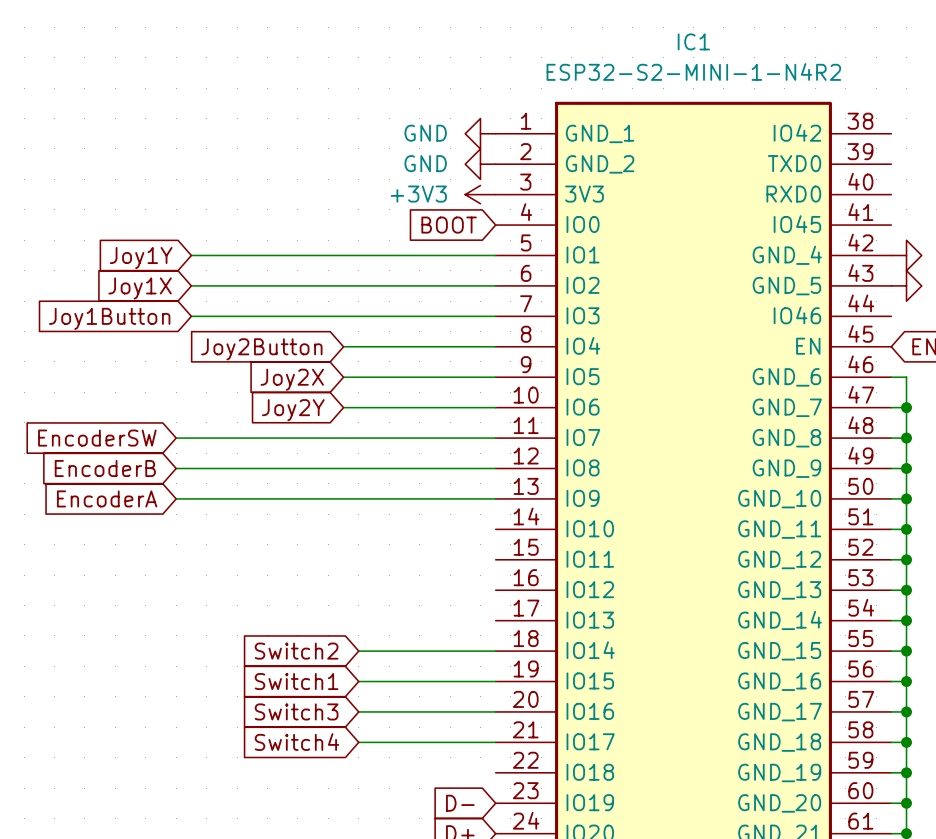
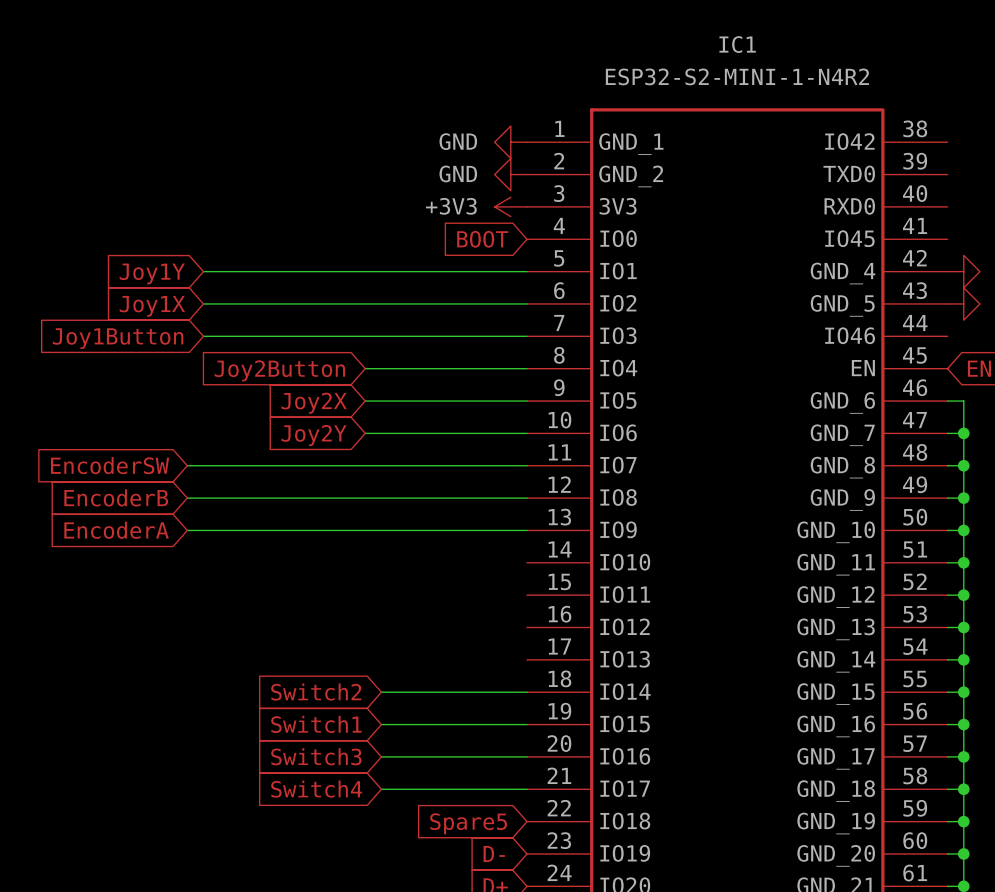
global label: none -> Spare5 (468, 823)

